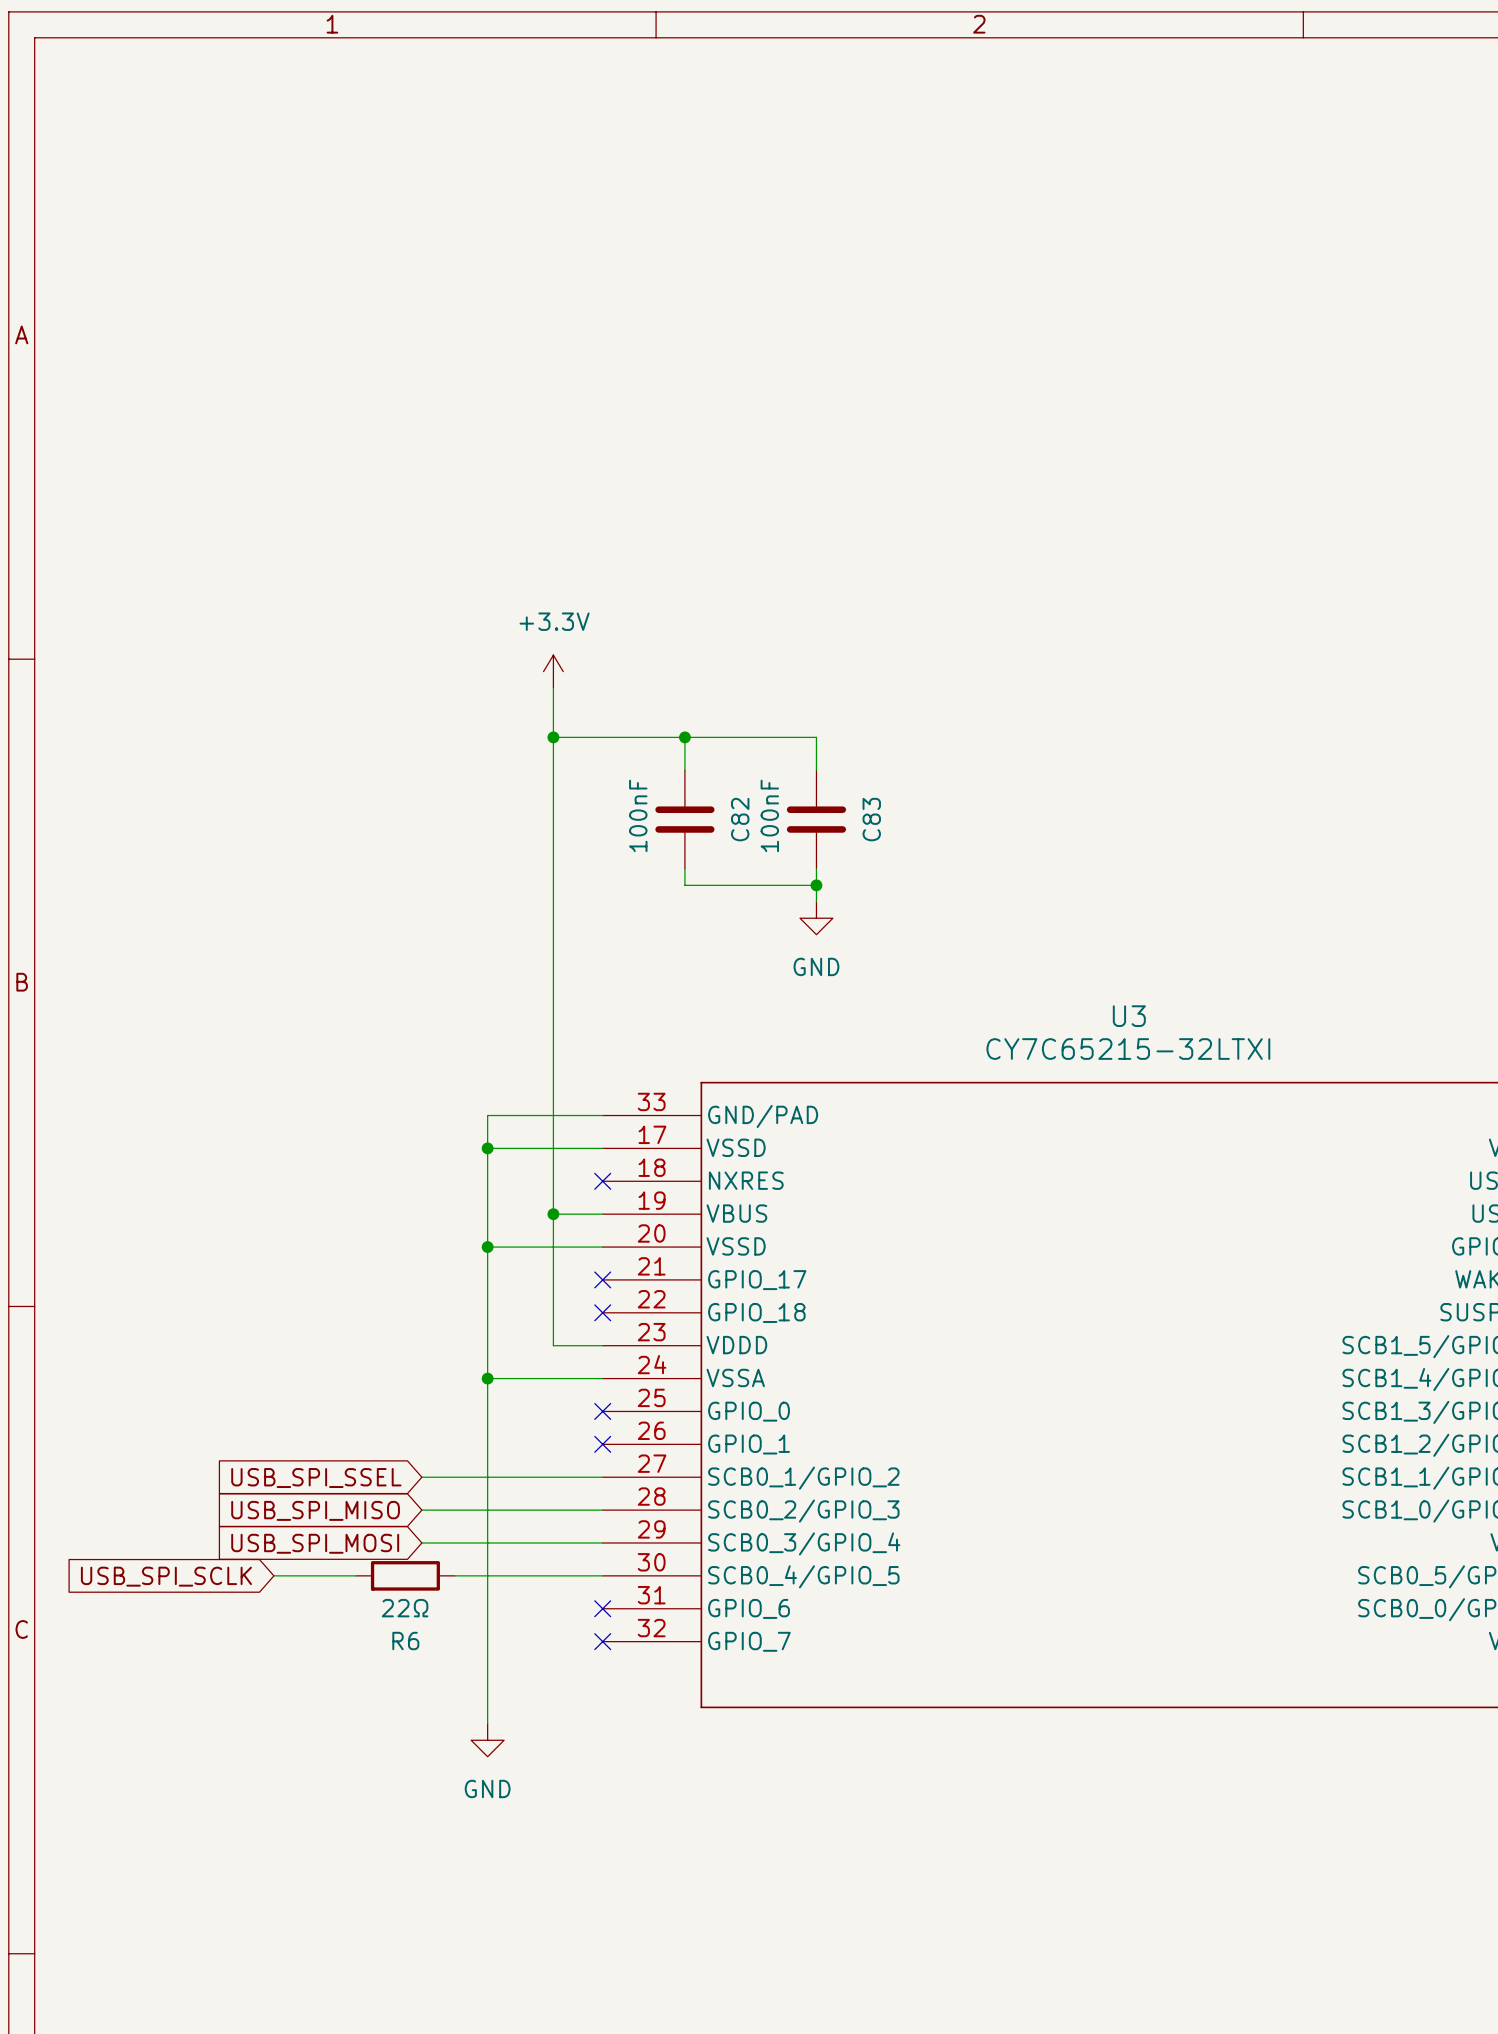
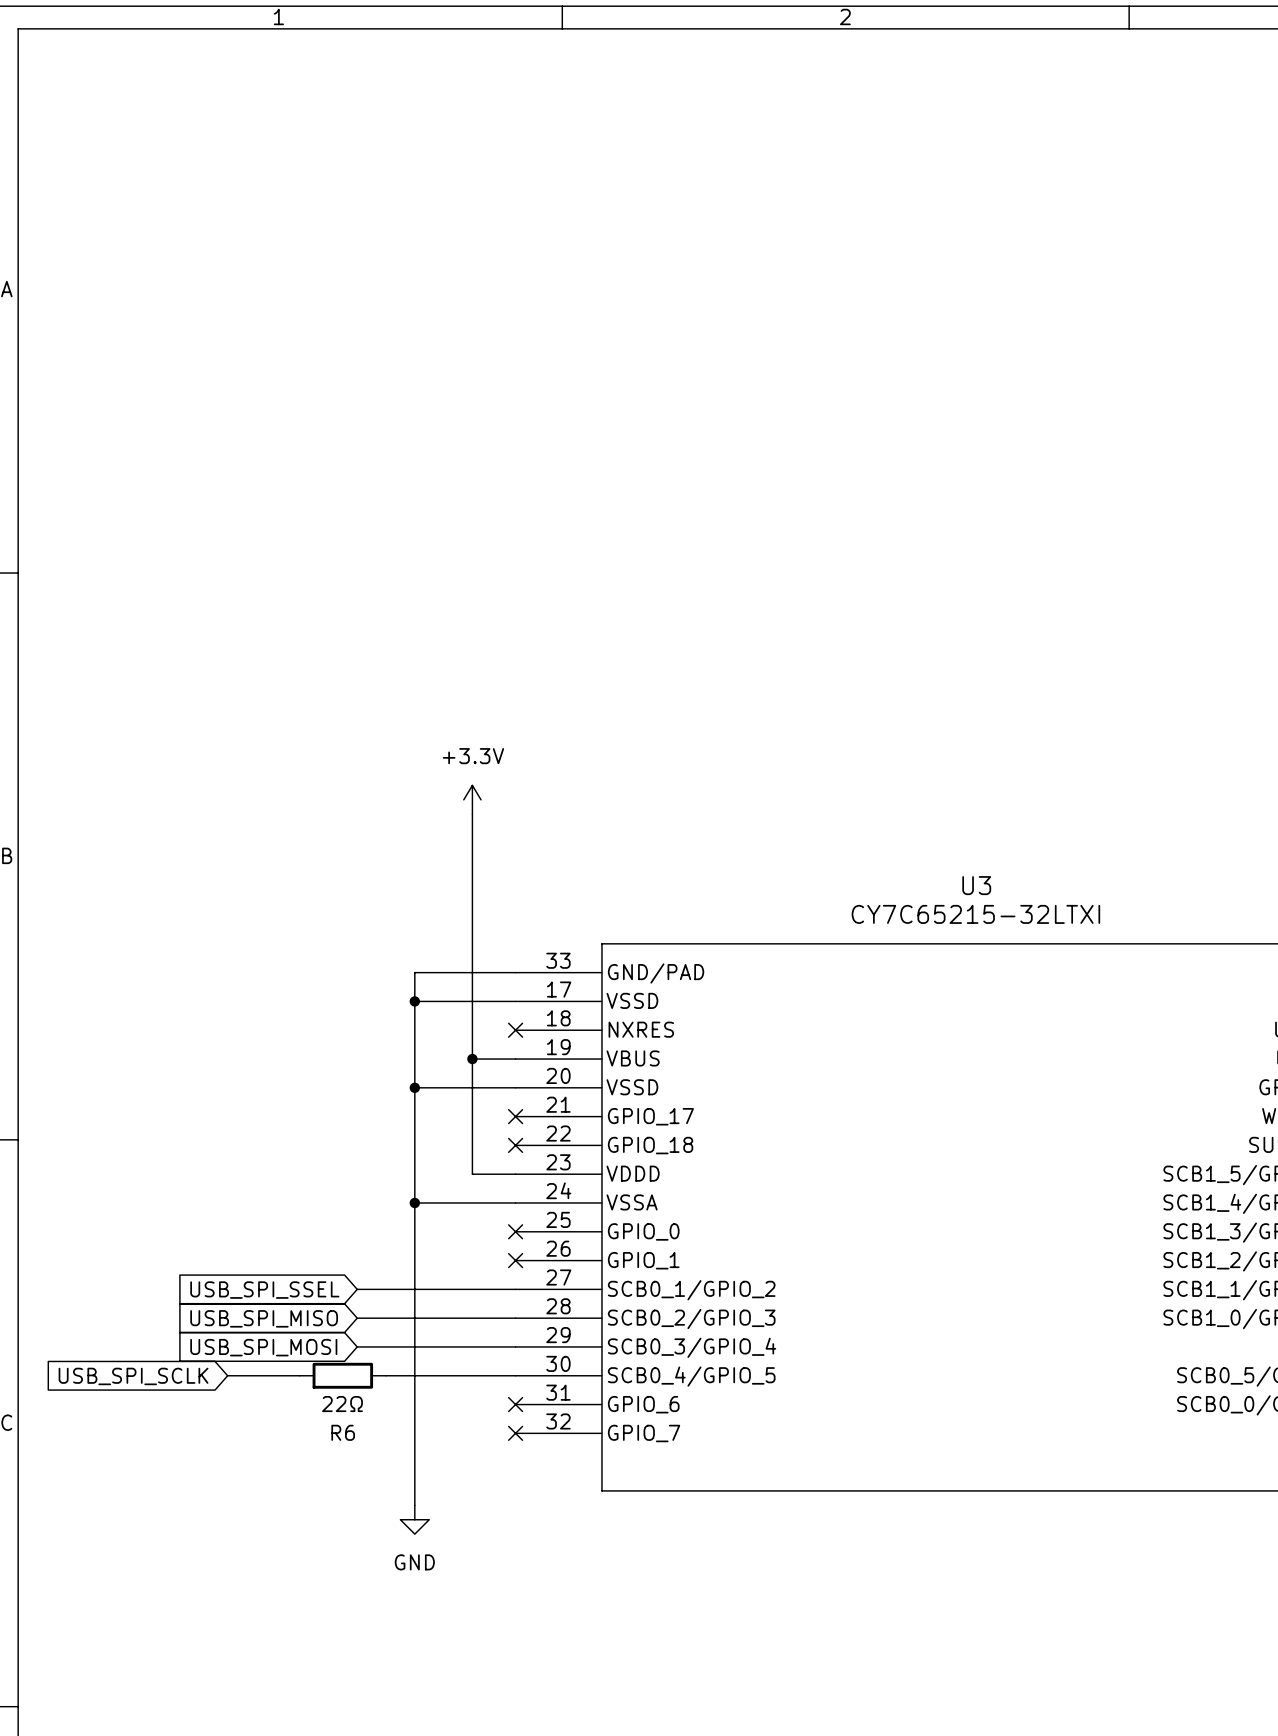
power symbol position: +3.3V (553, 671) -> +3.3V (472, 799)
wire: (553, 688) (553, 934) -> none
wire: (553, 737) (816, 737) (816, 770) -> none
junction: (553, 737) -> none
wire: (684, 737) (684, 770) -> none
junction: (684, 737) -> none
C82: 100nF (684, 819) -> none
C83: 100nF (816, 819) -> none
wire: (684, 868) (684, 885) (816, 885) -> none
wire: (816, 868) (816, 901) -> none
junction: (816, 885) -> none
power symbol: GND (816, 918) -> none

